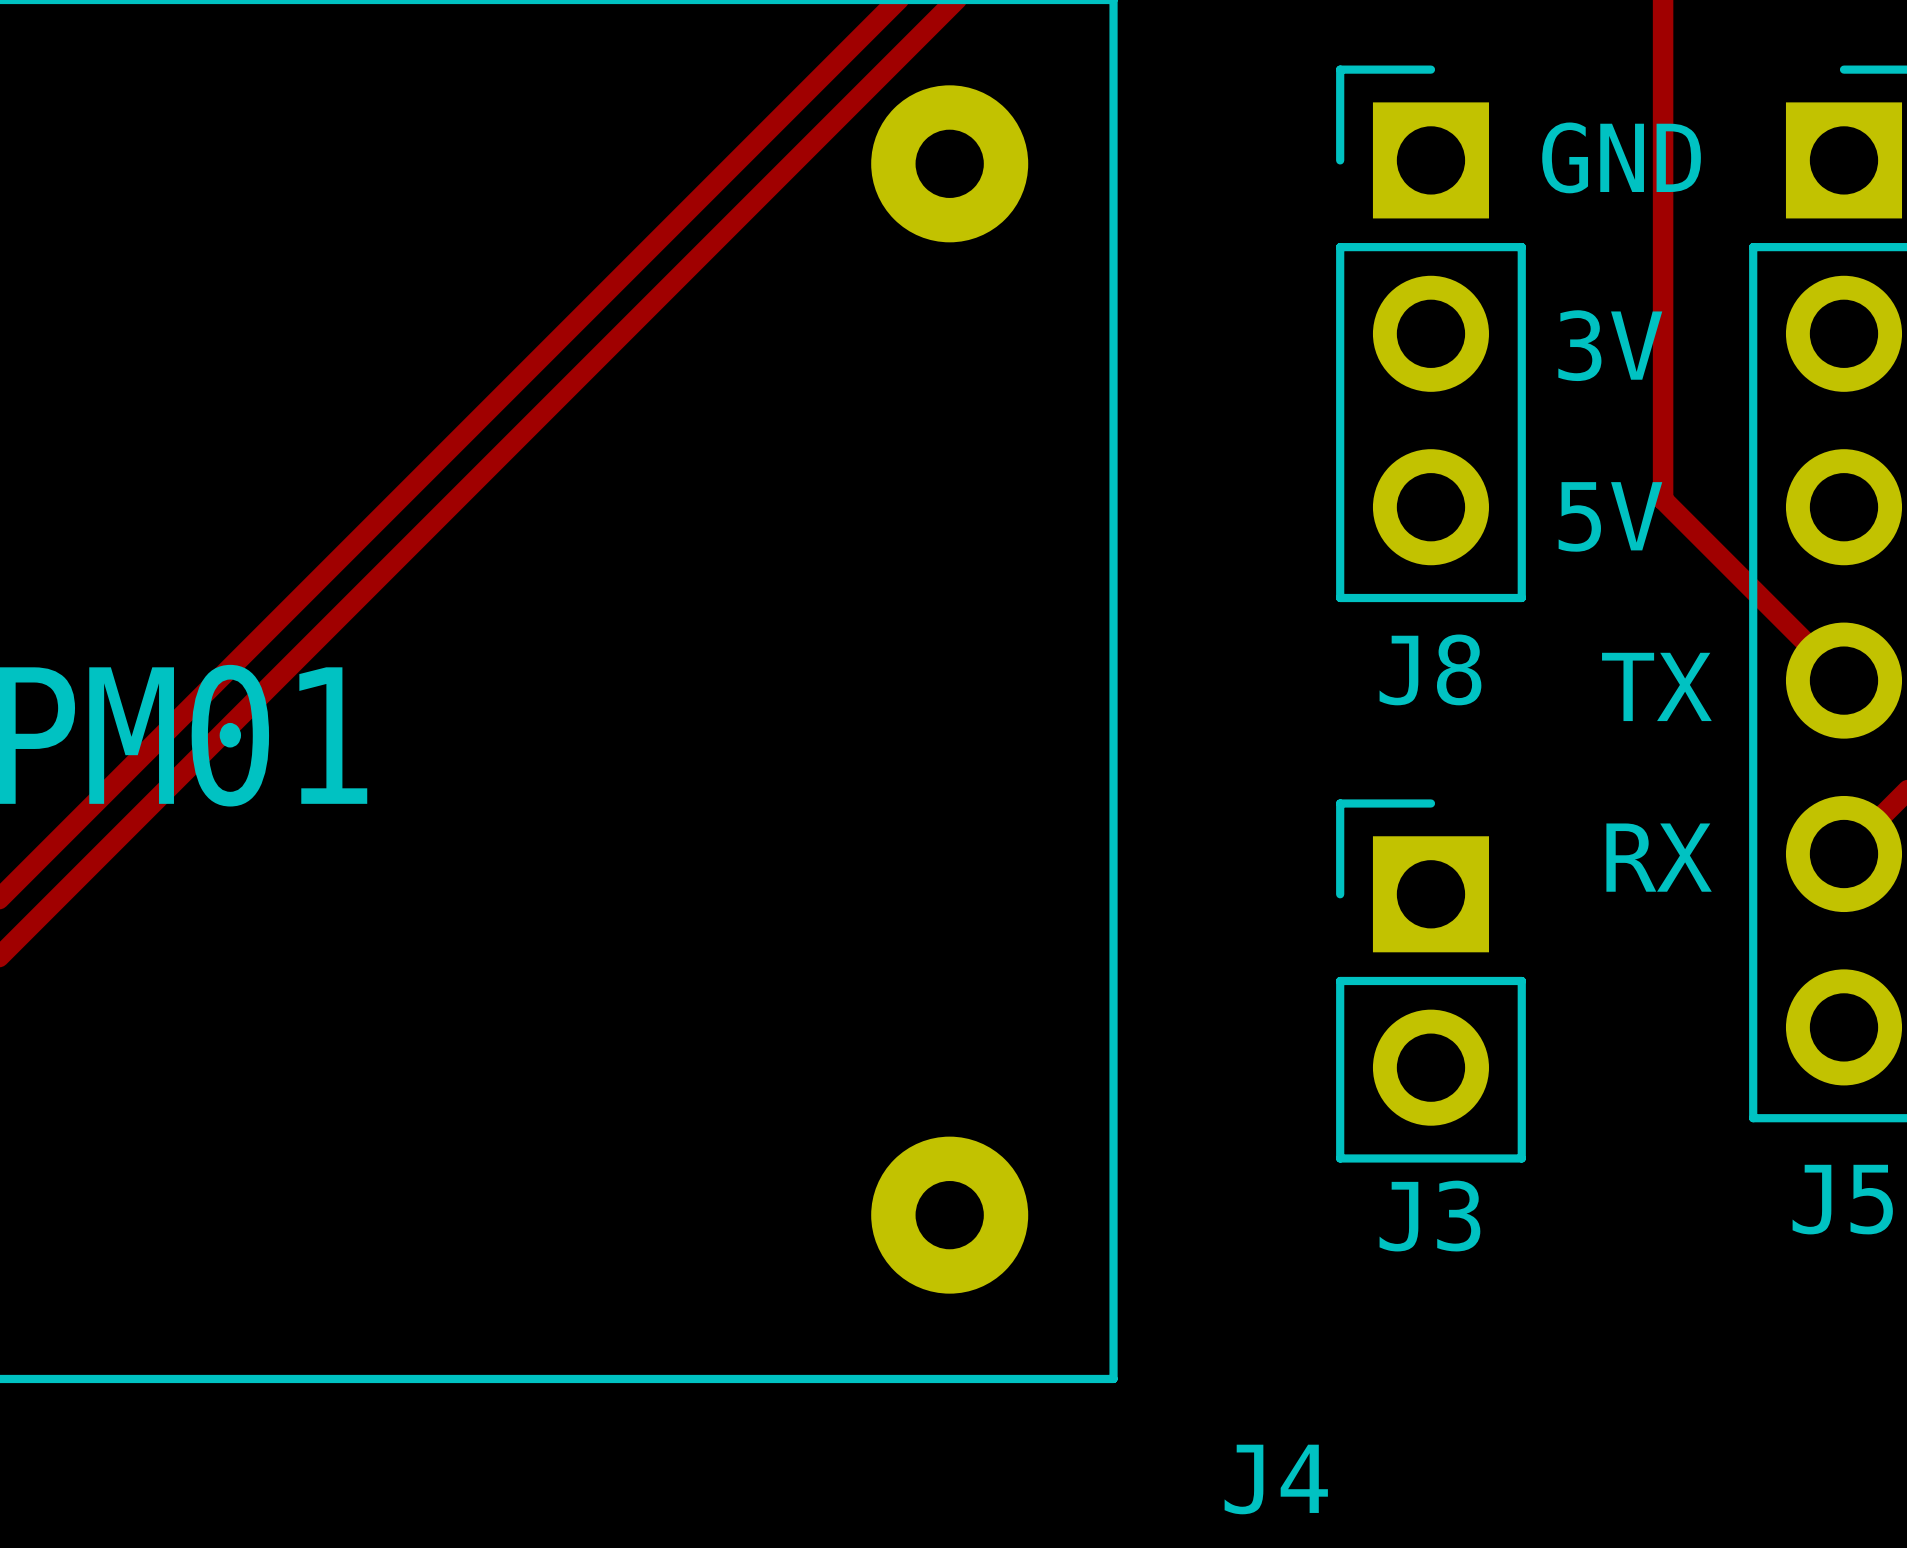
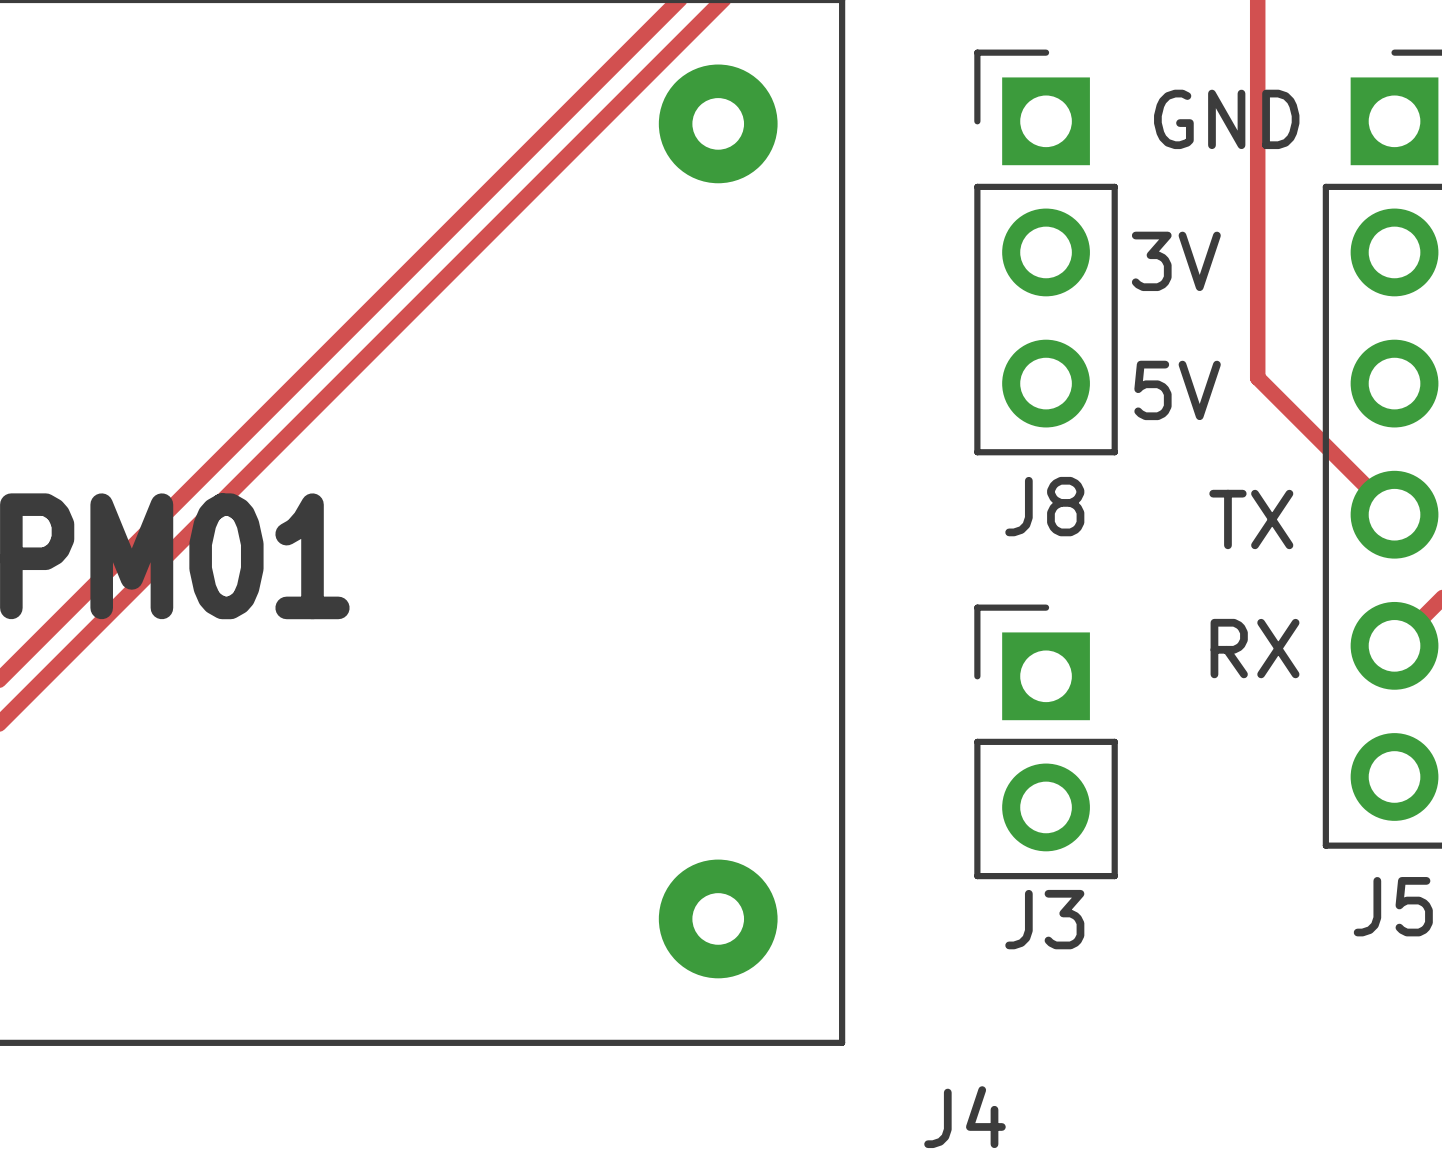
J8 position: (1430, 333) -> (1046, 252)
text position: 3V (1610, 345) -> 3V (1176, 261)
text position: 5V (1610, 516) -> 5V (1177, 390)
J3 position: (1430, 980) -> (1046, 741)

